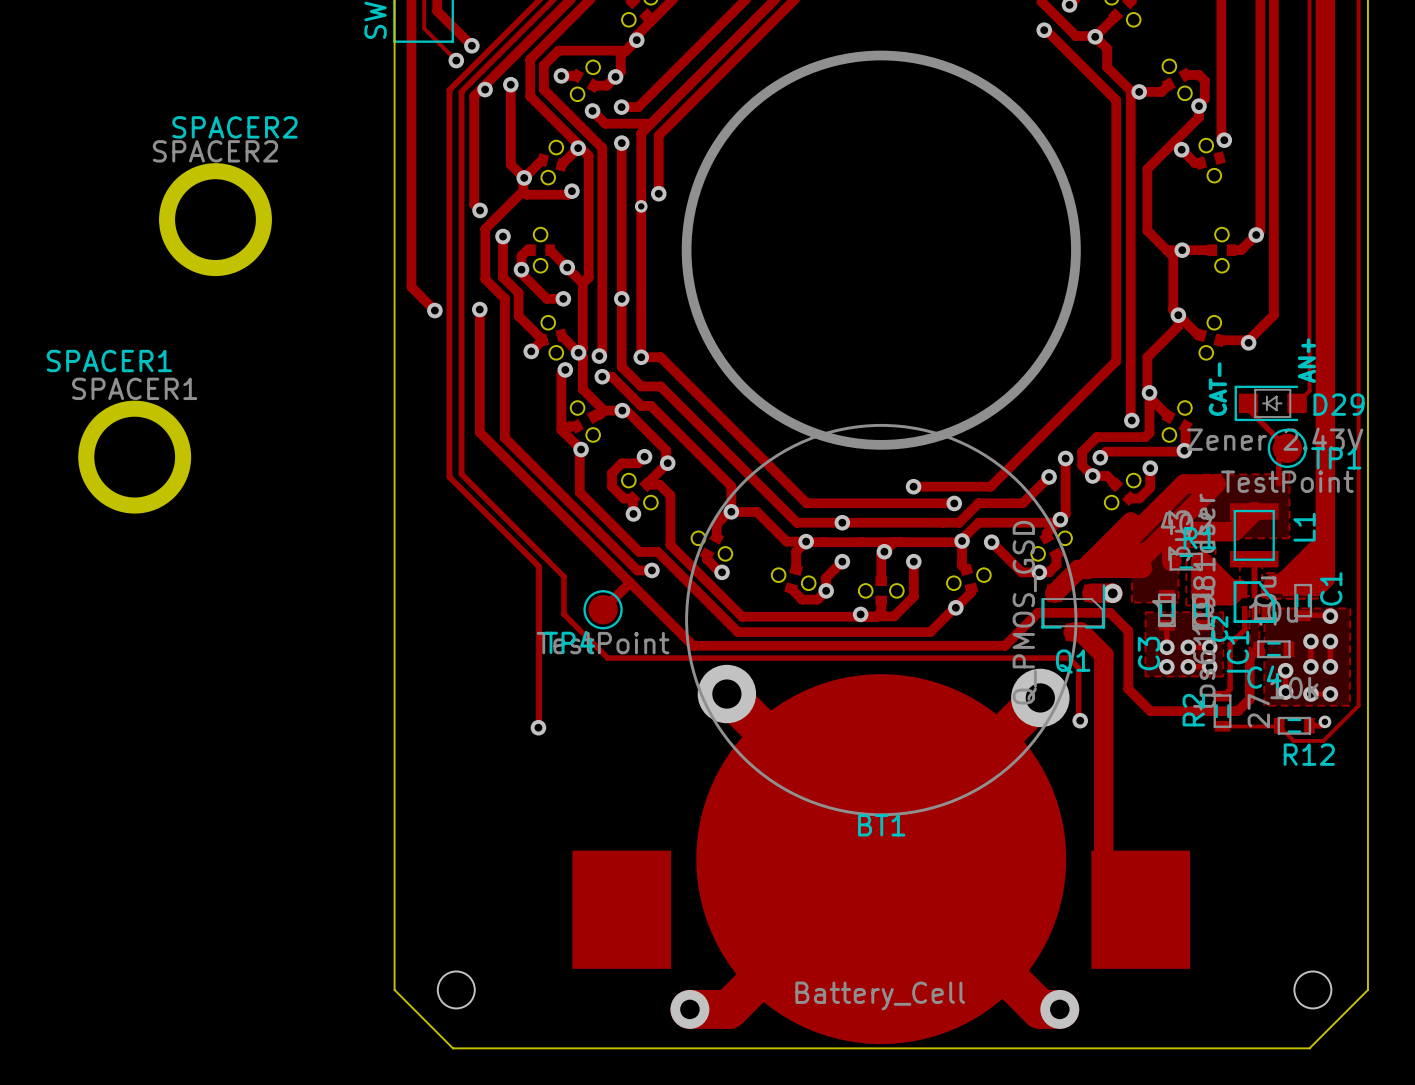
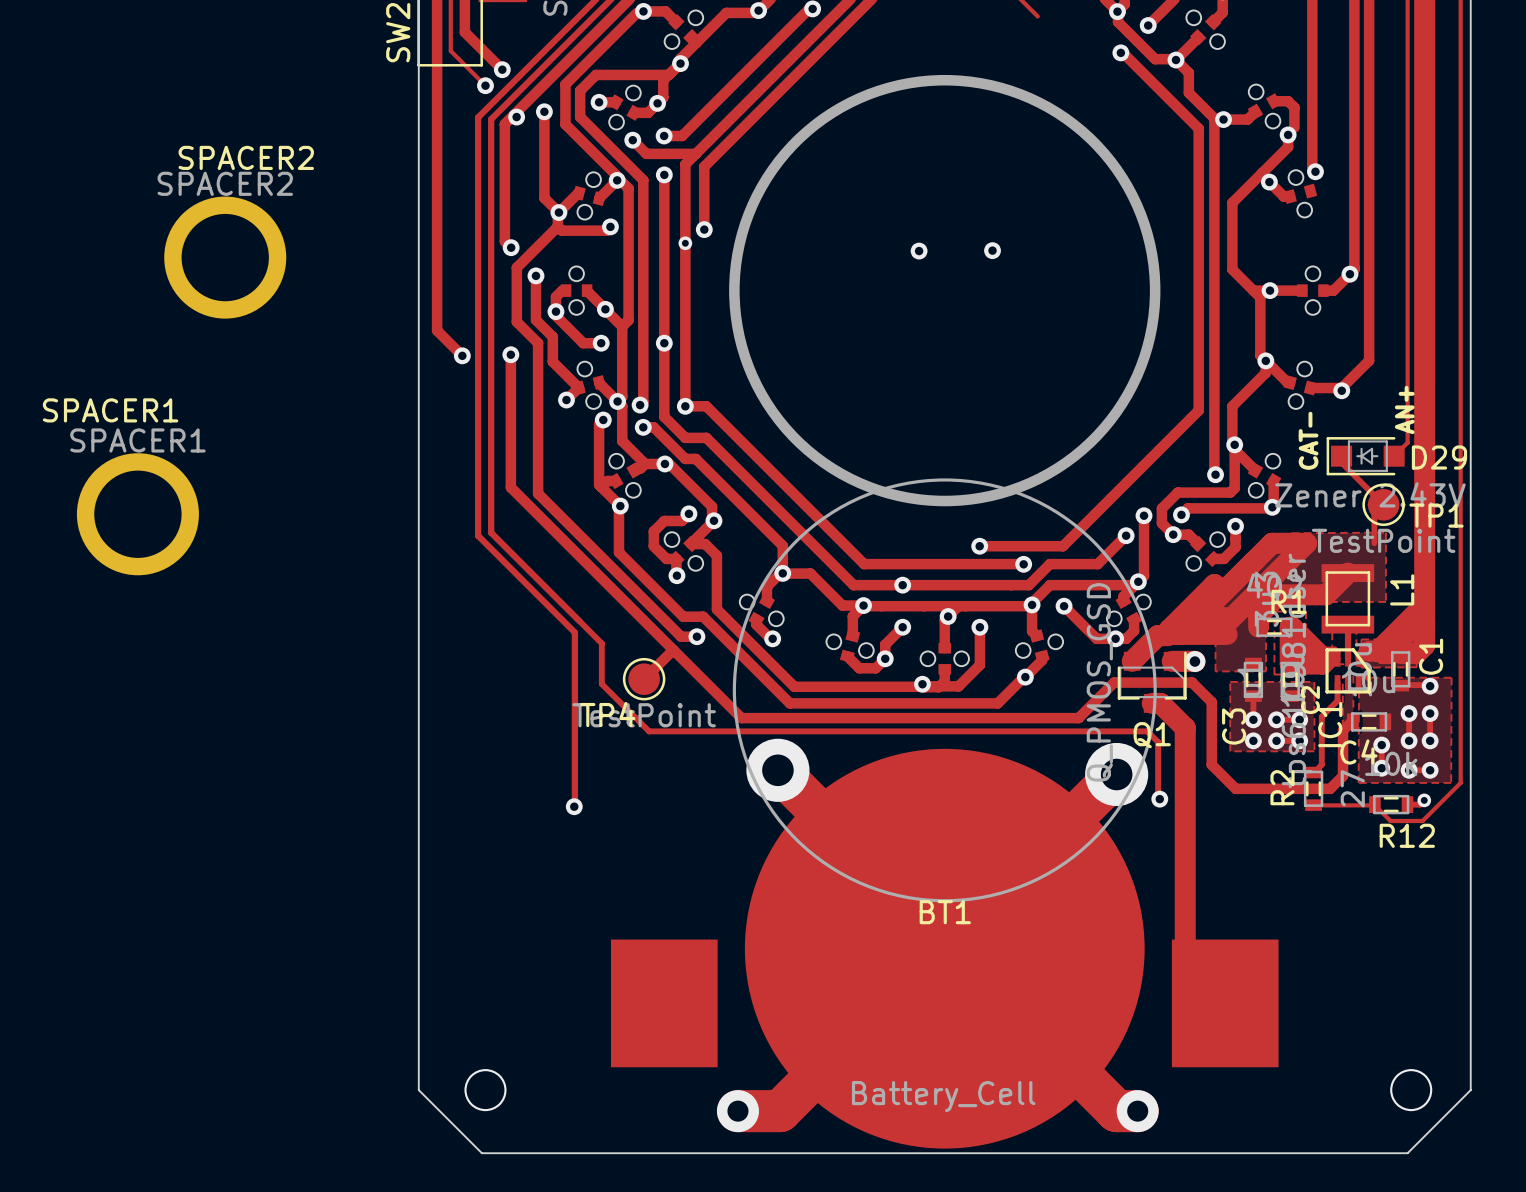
via: none -> (919, 251)
via: none -> (992, 250)

